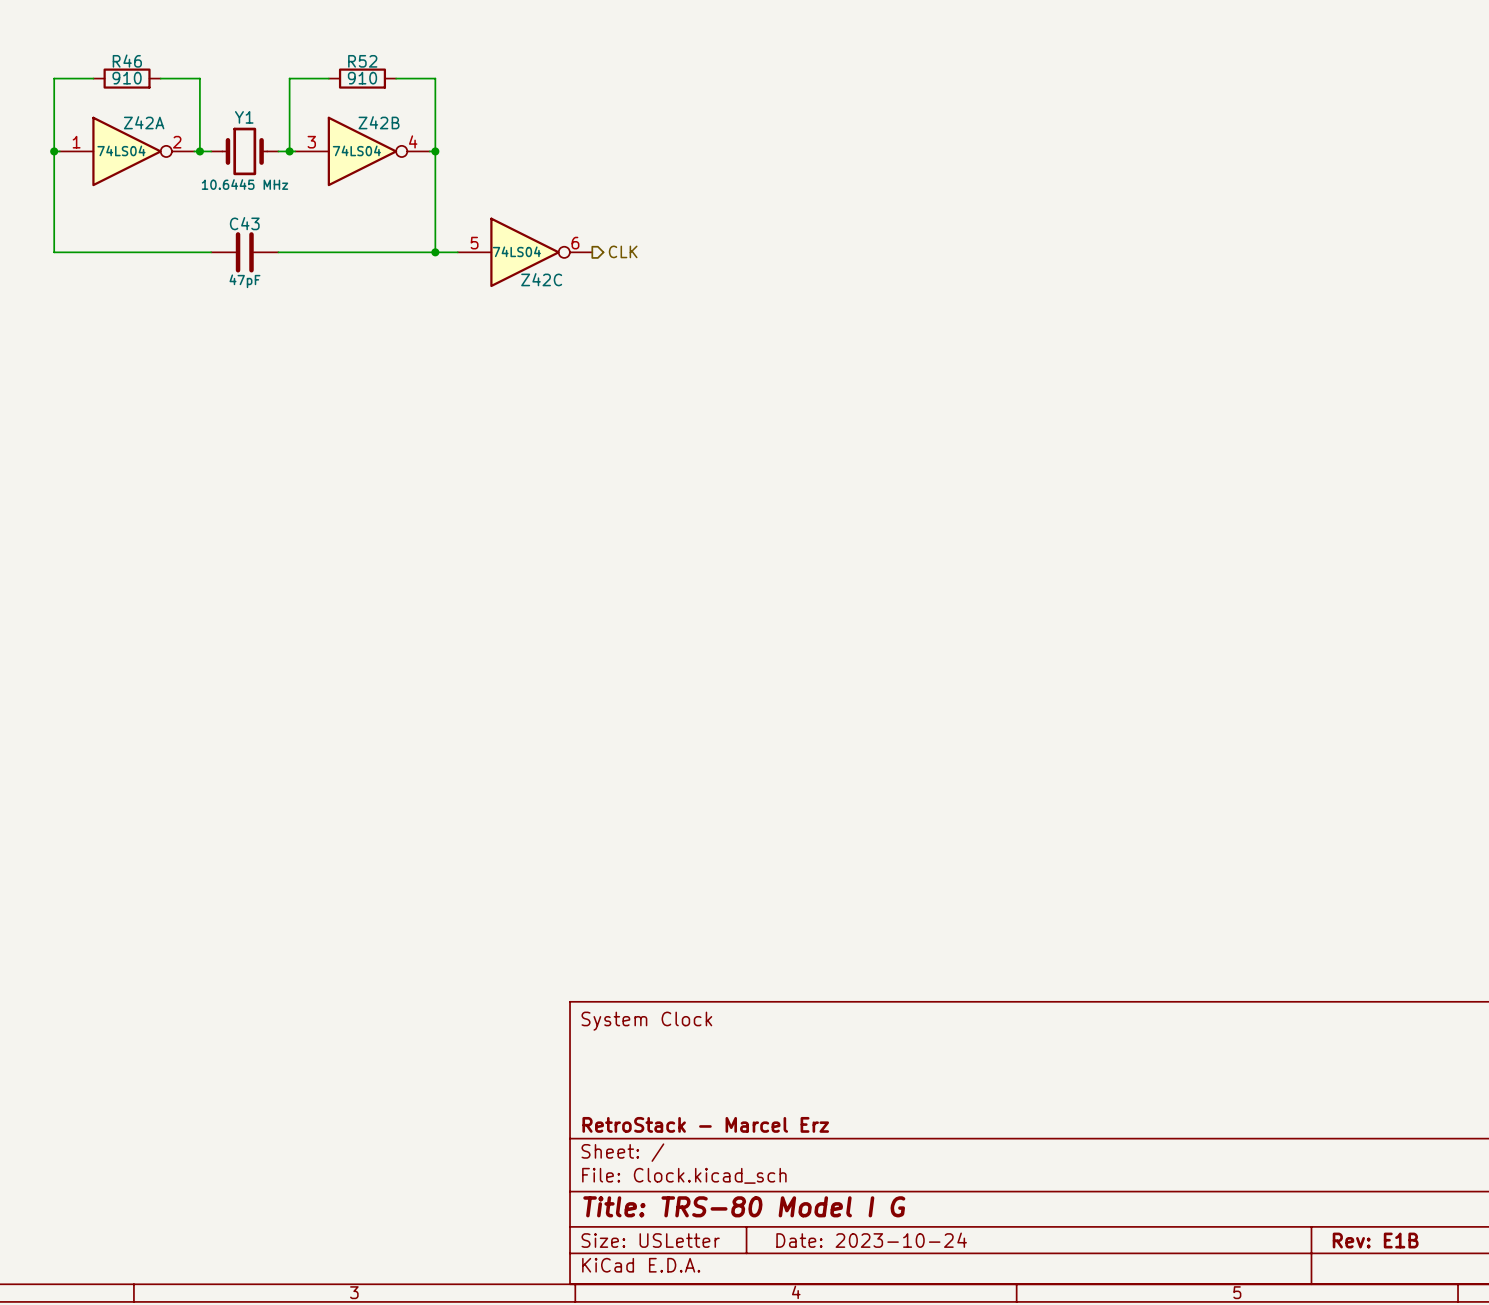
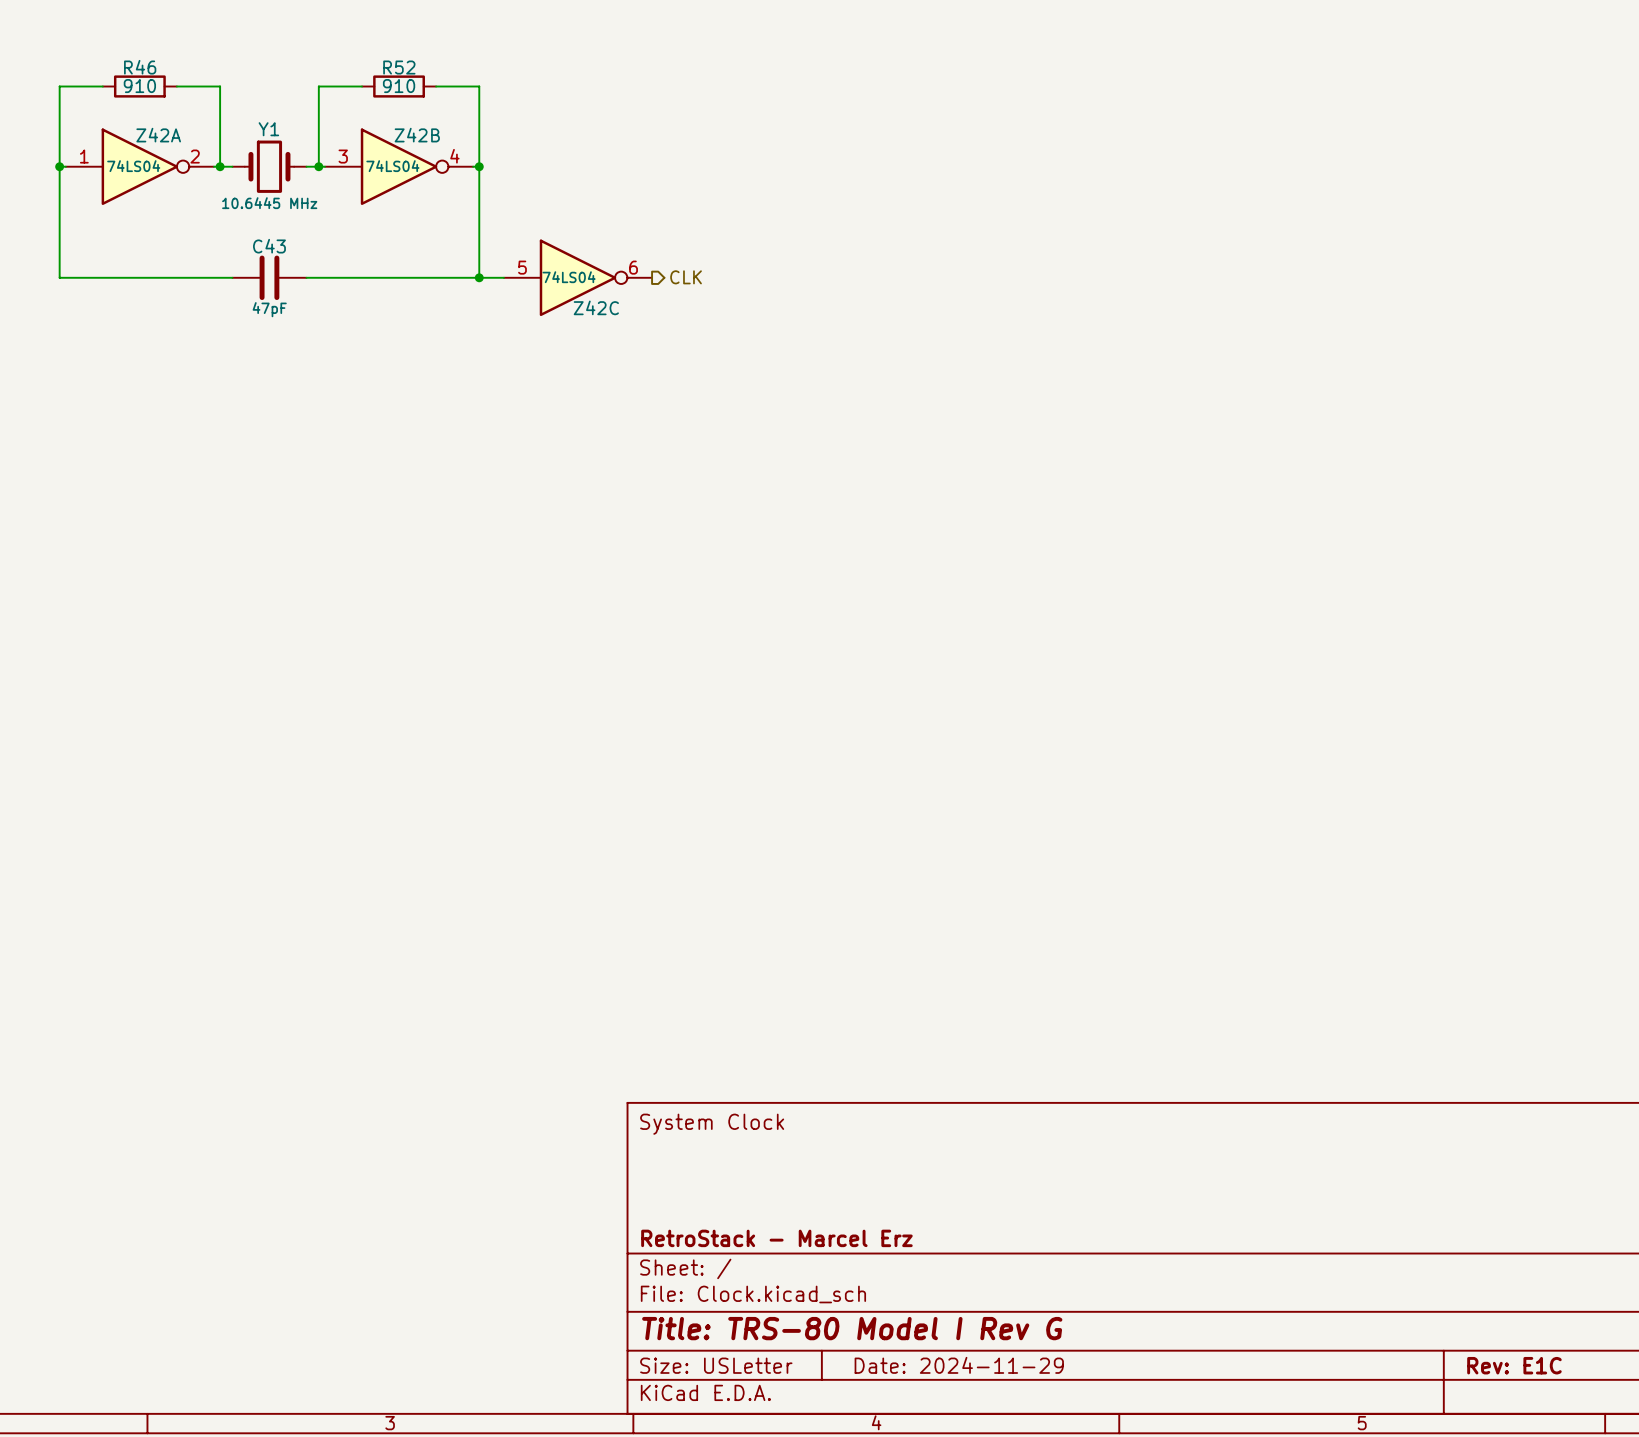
title block: Title: TRS-80 Model I G (744, 1206) -> Title: TRS-80 Model I Rev G (852, 1328)
title block: Date: 2023-10-24 (871, 1240) -> Date: 2024-11-29 (959, 1365)
title block: Rev: E1B (1375, 1240) -> Rev: E1C (1514, 1365)

